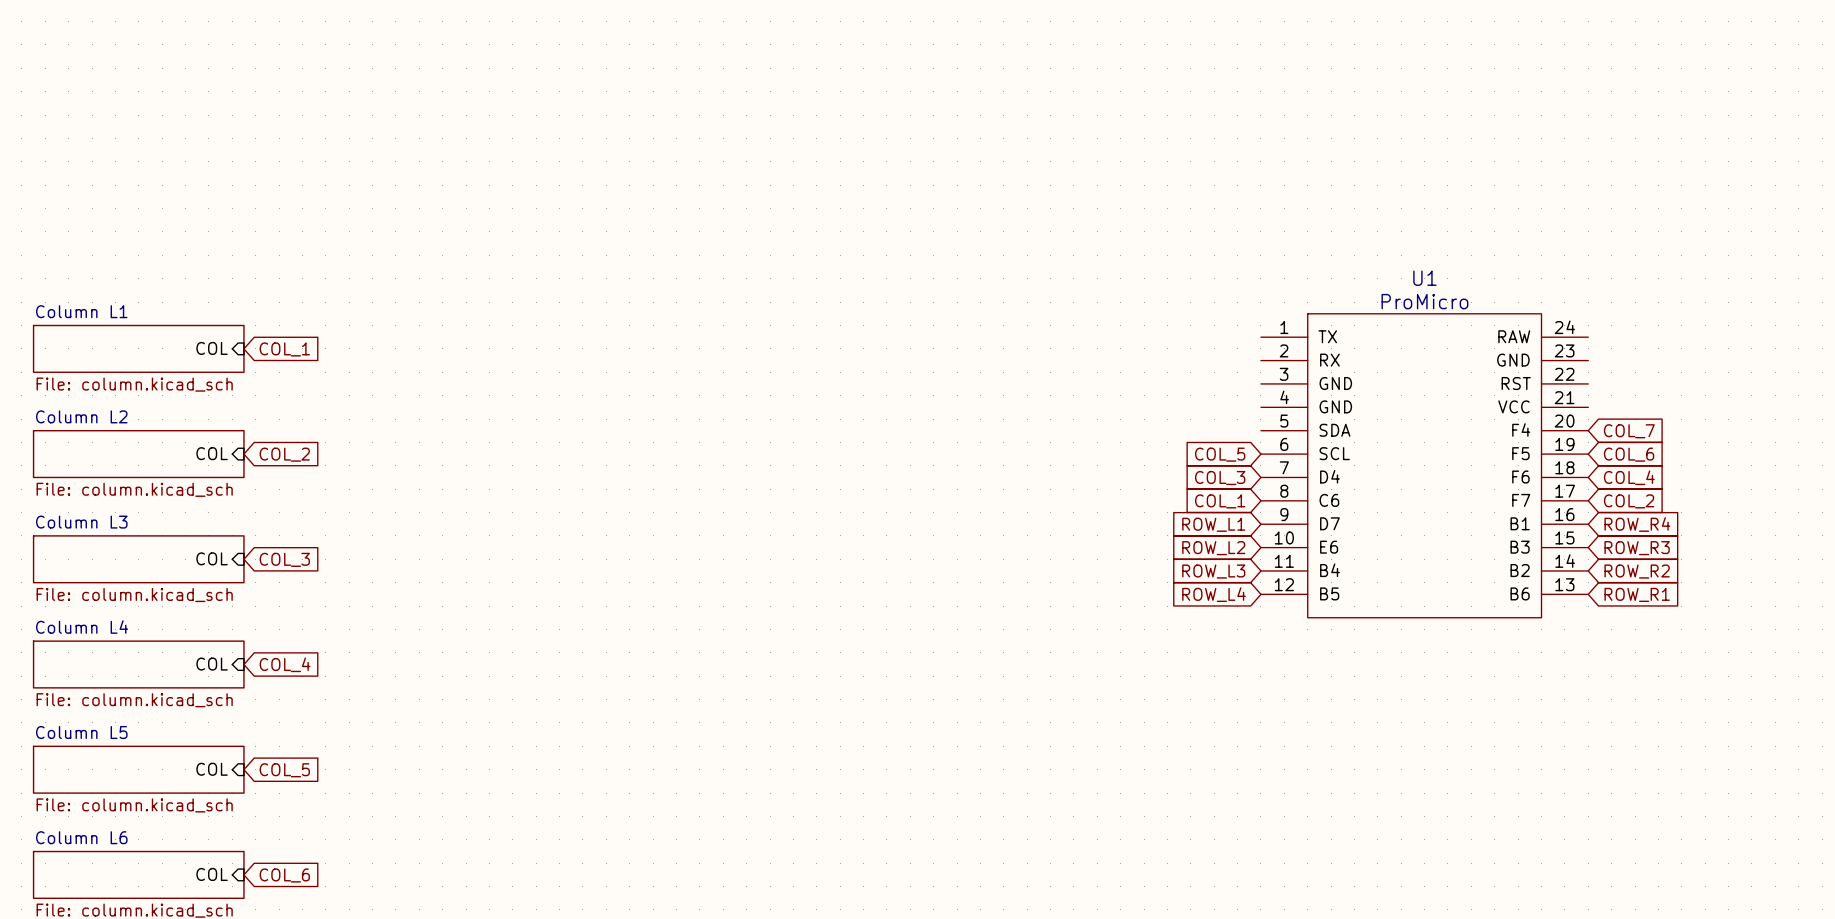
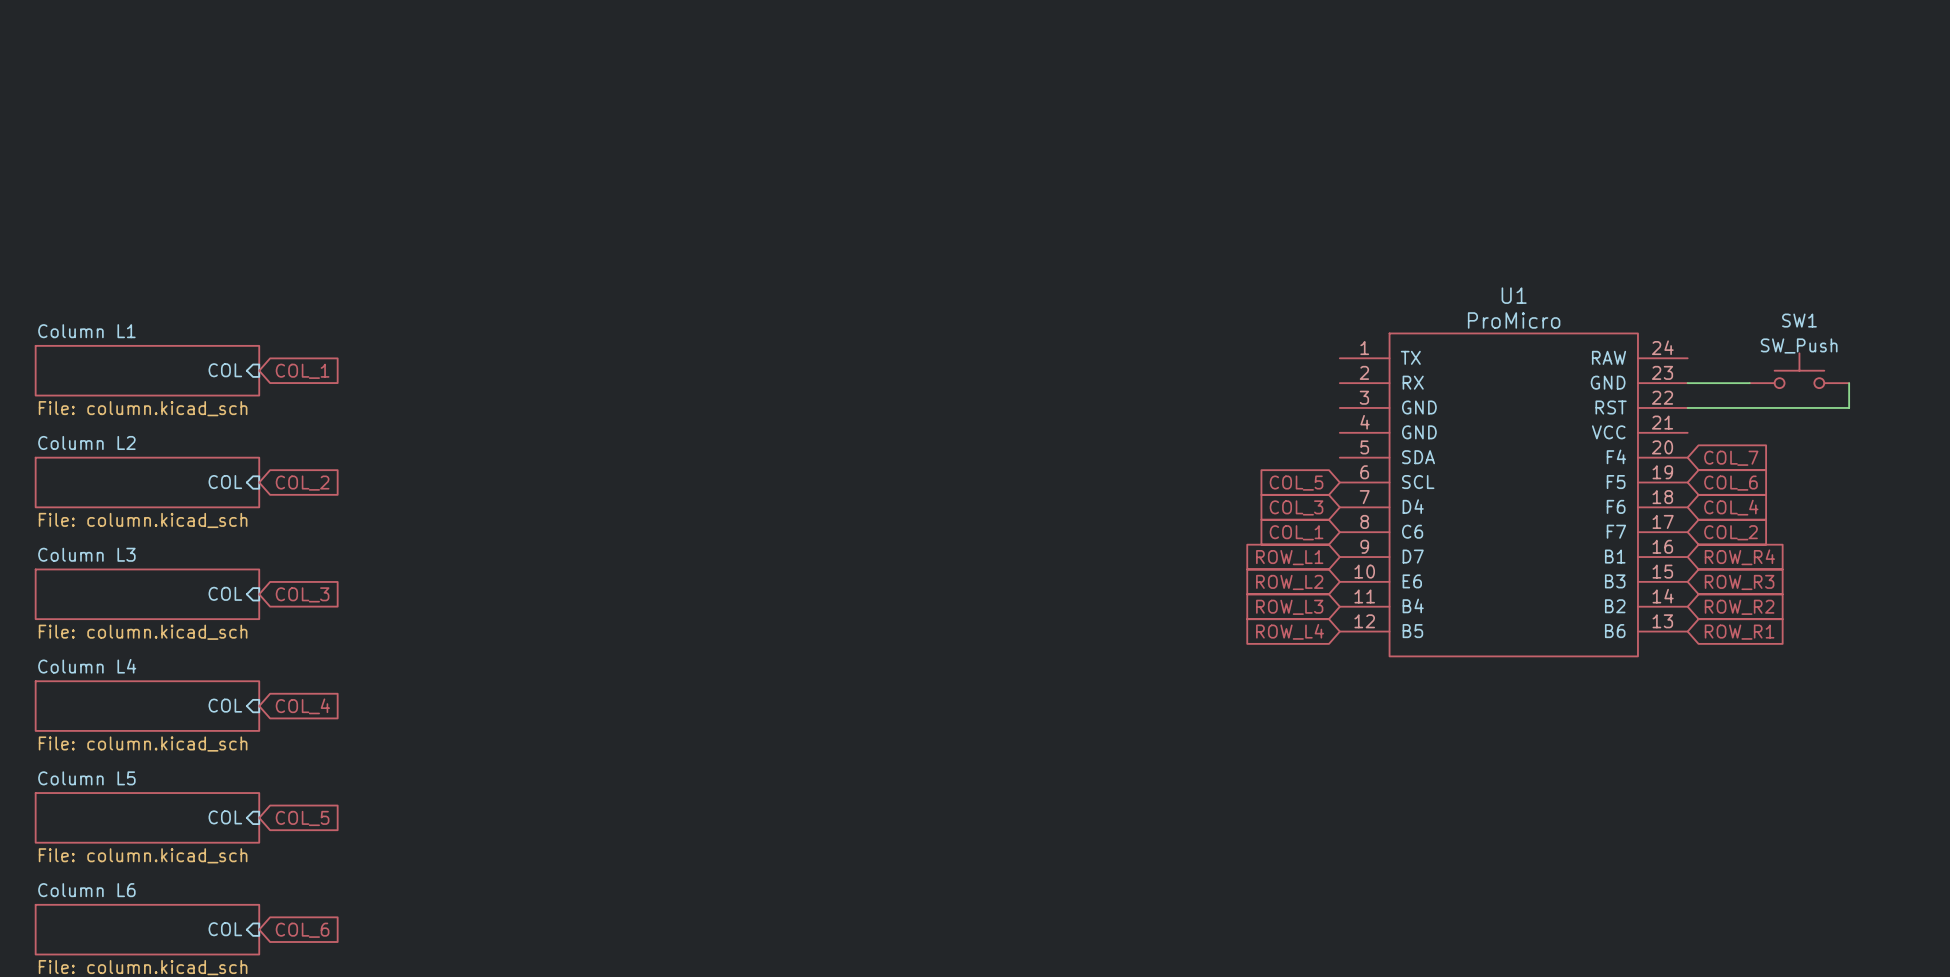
SW1: none -> SW_Push (1799, 370)
wire: none -> (1687, 383) (1749, 383)
wire: none -> (1849, 383) (1849, 407) (1687, 407)

